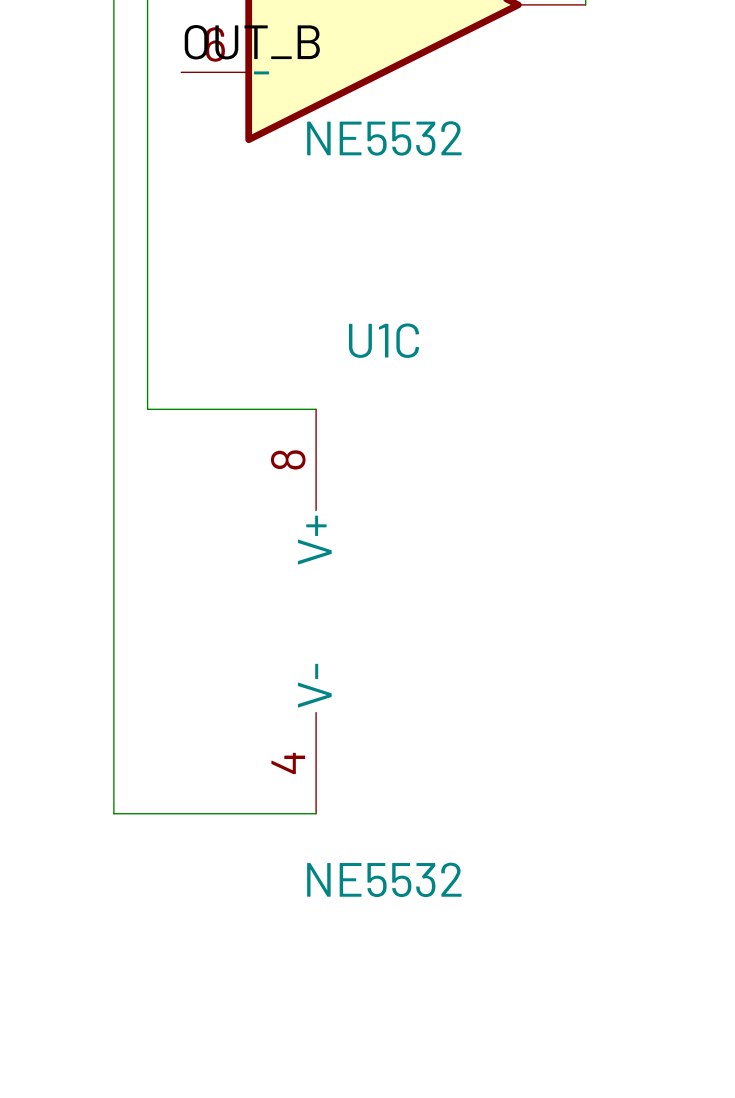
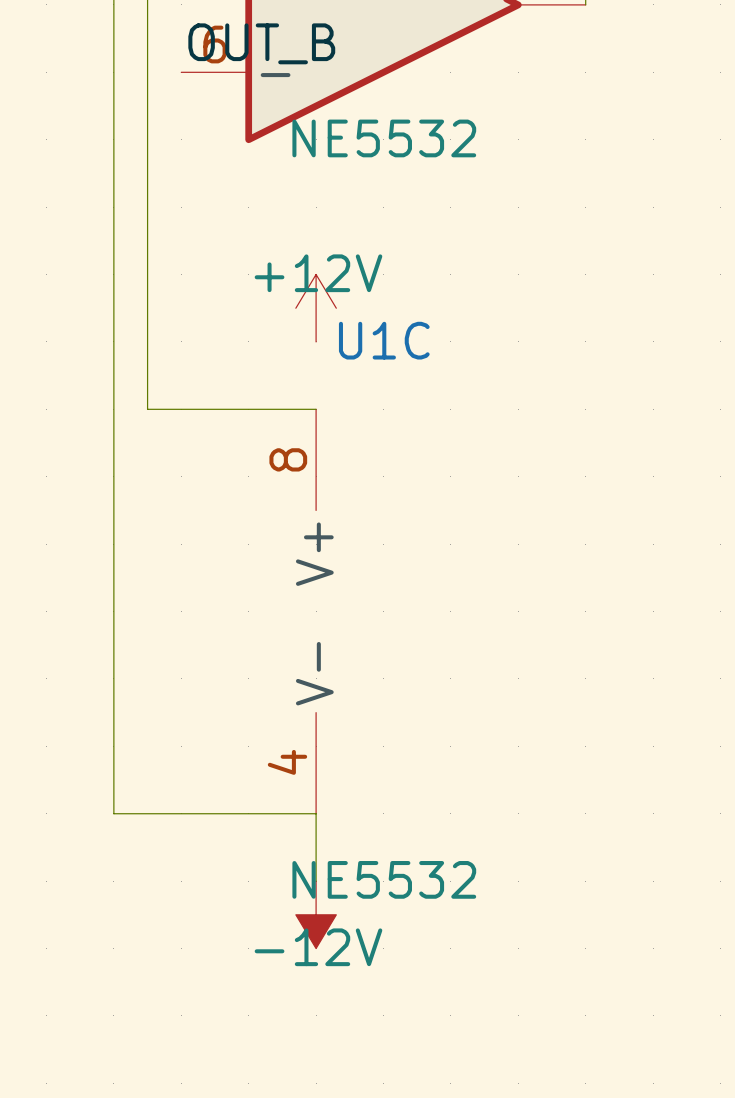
power symbol: none -> +12V (316, 308)
wire: none -> (316, 813) (316, 881)
power symbol: none -> -12V (316, 914)

